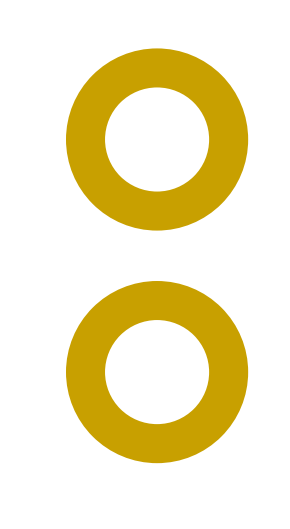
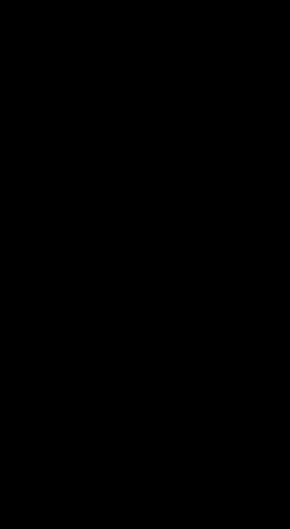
part: (157, 139) -> none
part: (157, 372) -> none

